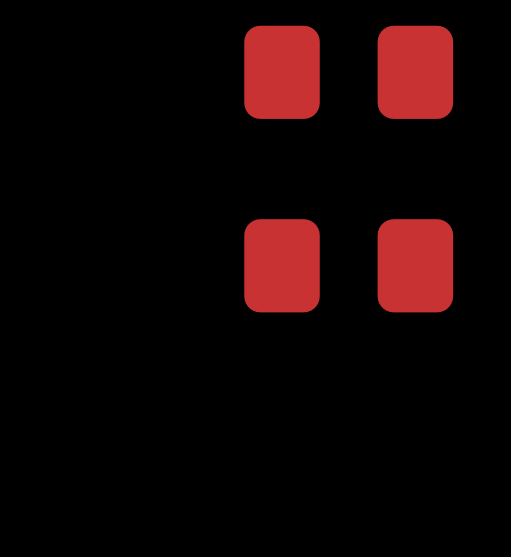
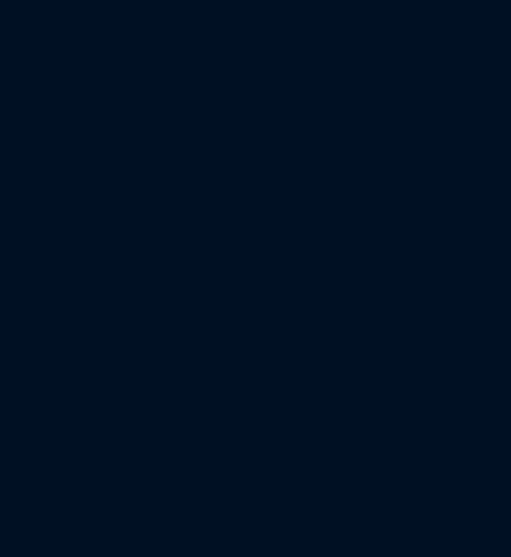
part: (348, 72) -> none
part: (348, 265) -> none

